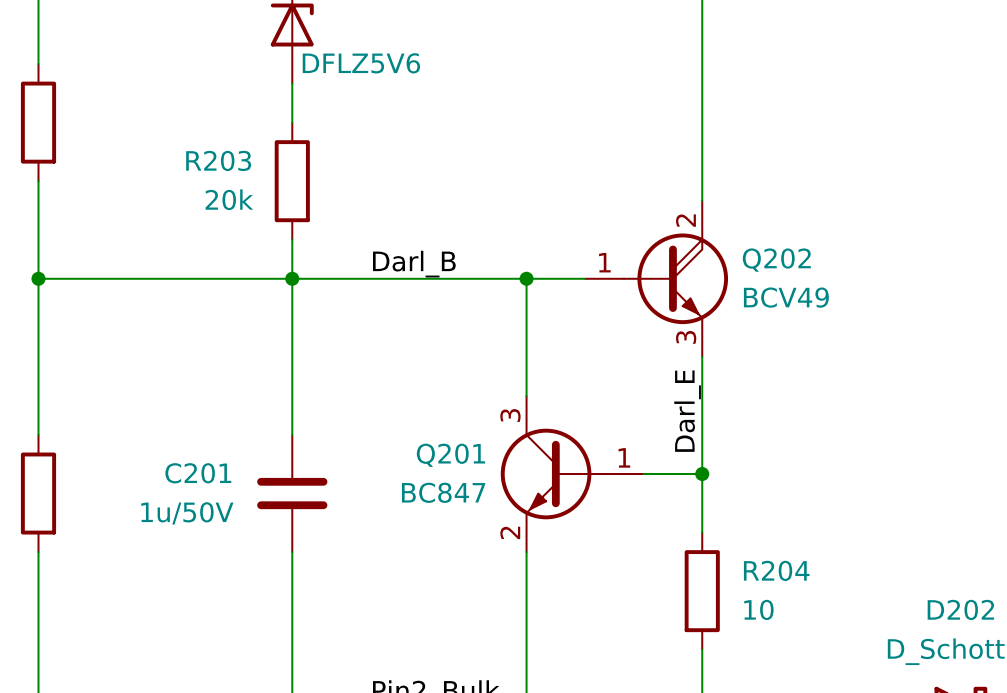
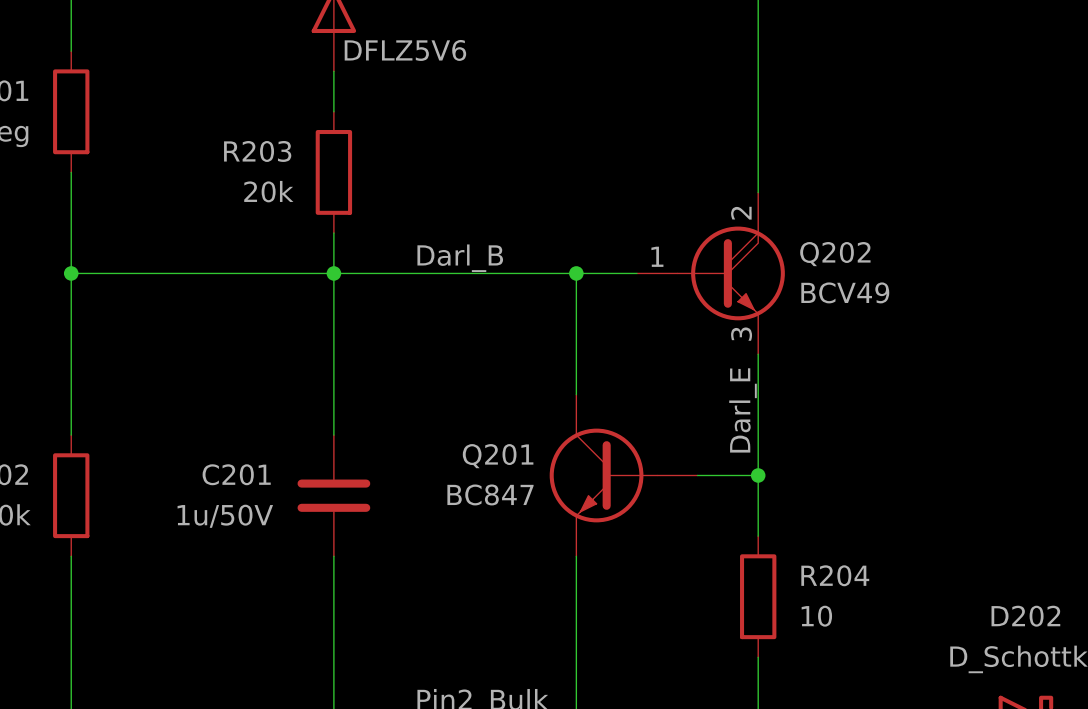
Q201 pin number: 3 (510, 415) -> none
Q201 pin number: 1 (624, 457) -> none
Q201 pin number: 2 (510, 532) -> none

